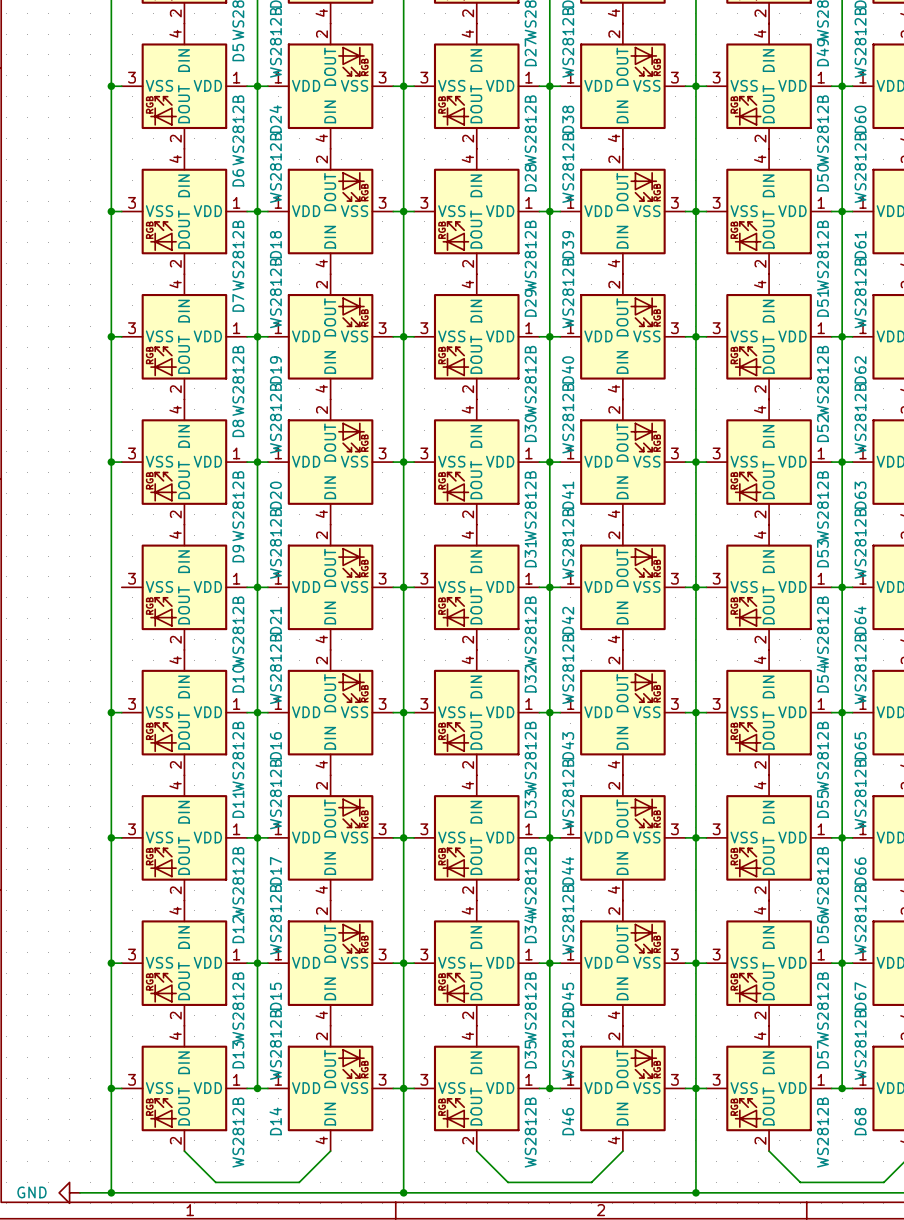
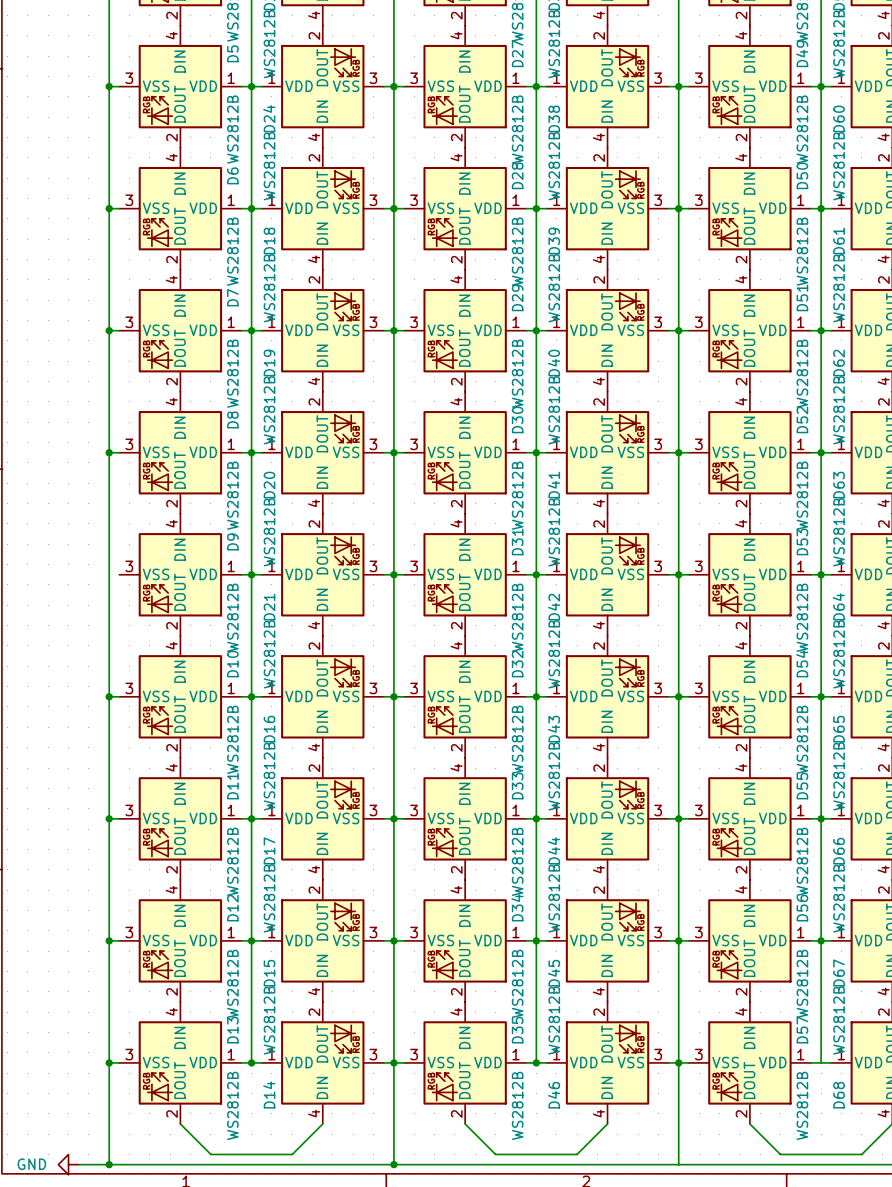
junction: (842, 1088) -> none
junction: (695, 1192) -> none

